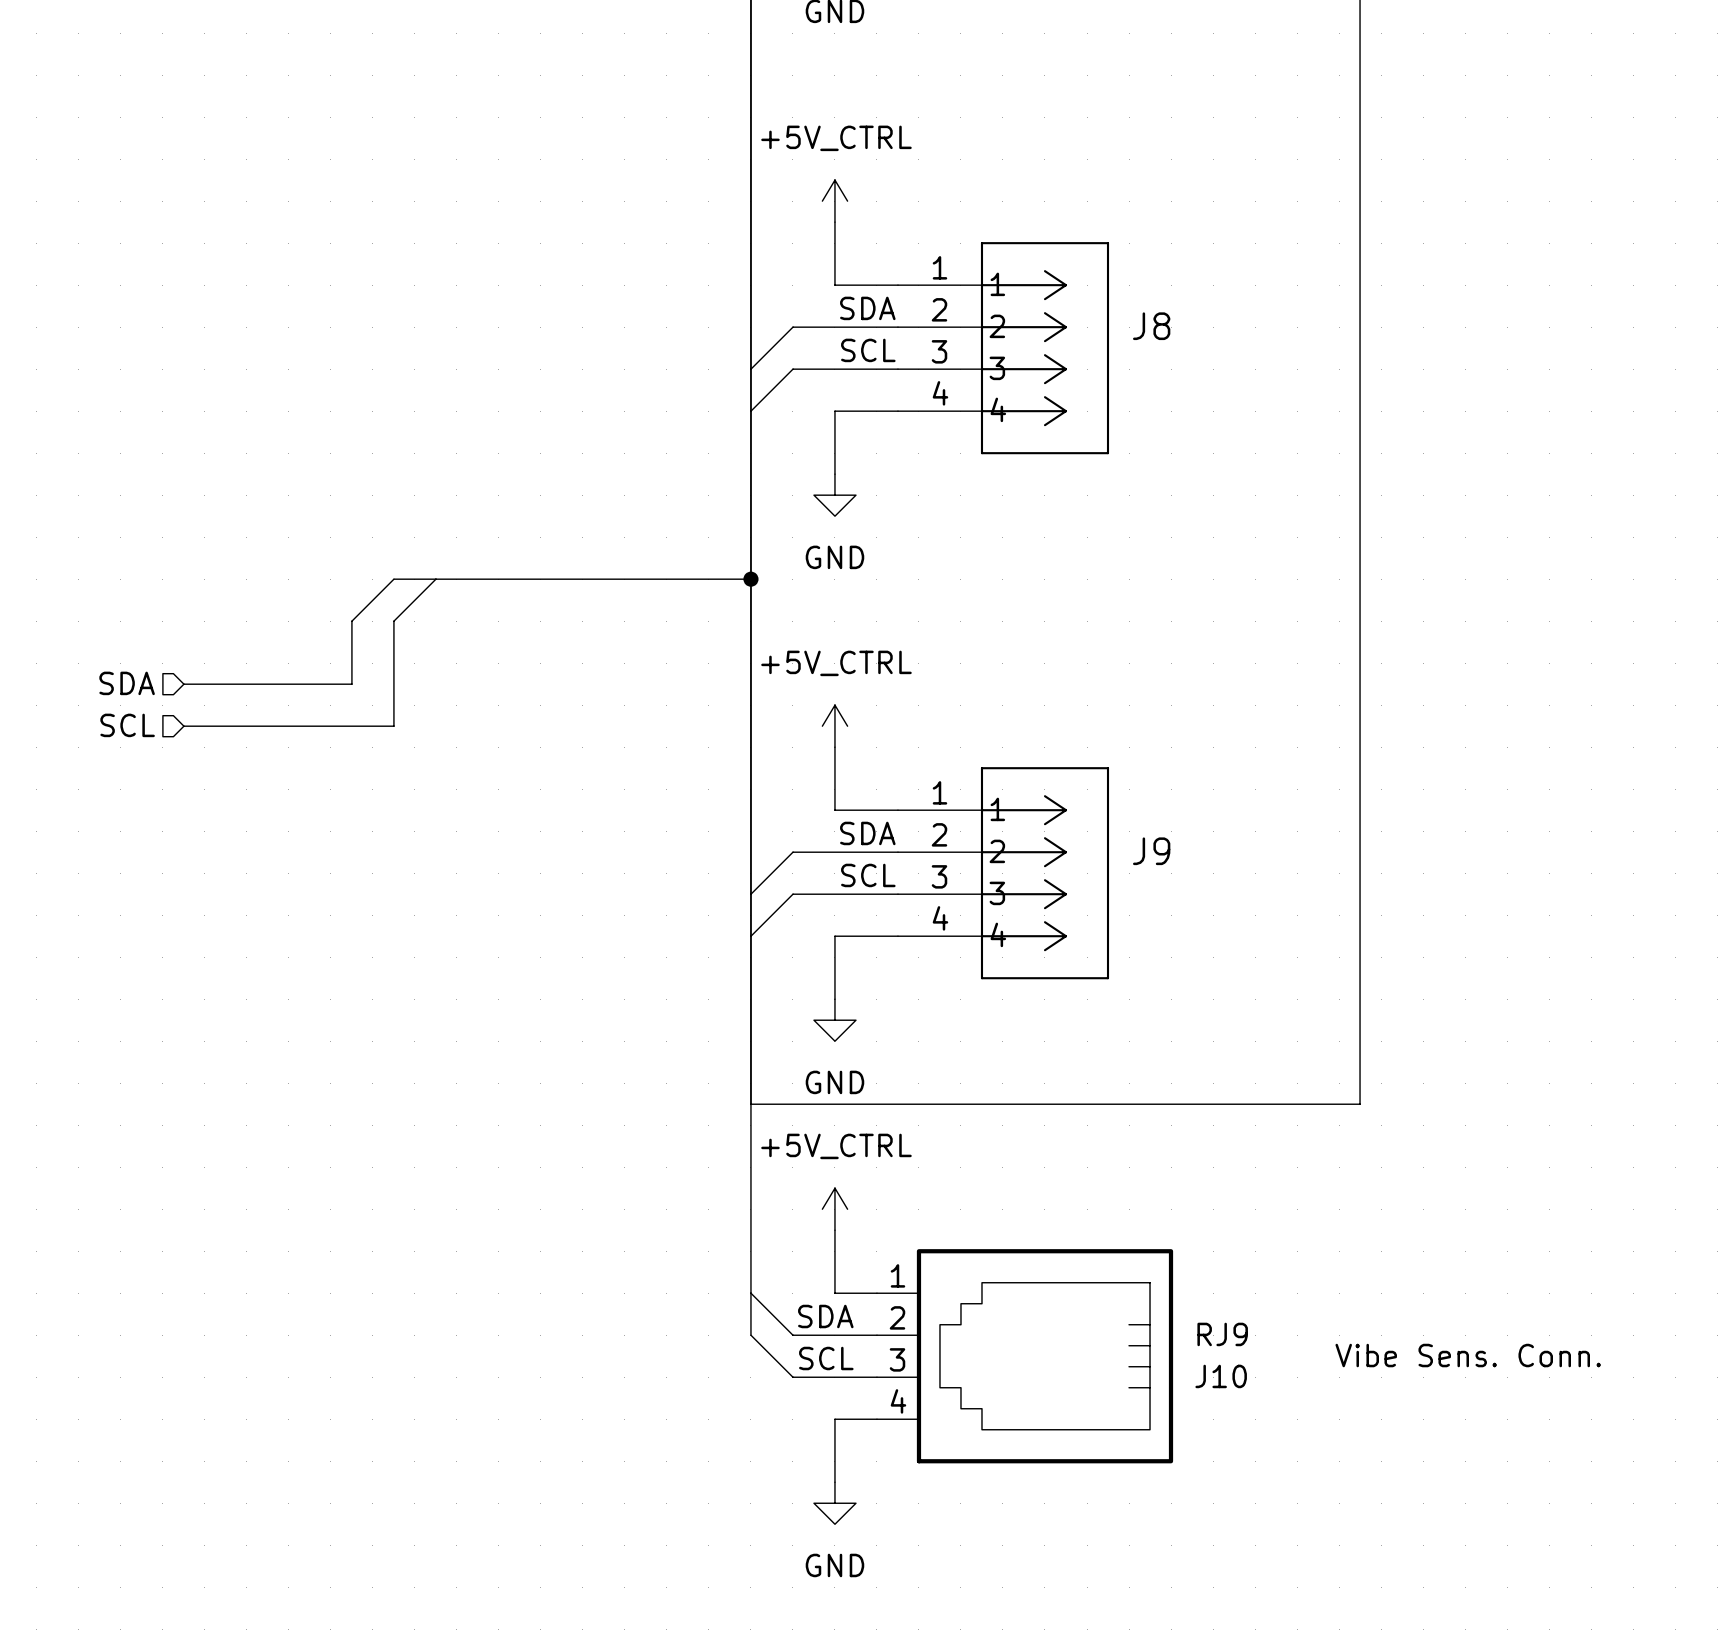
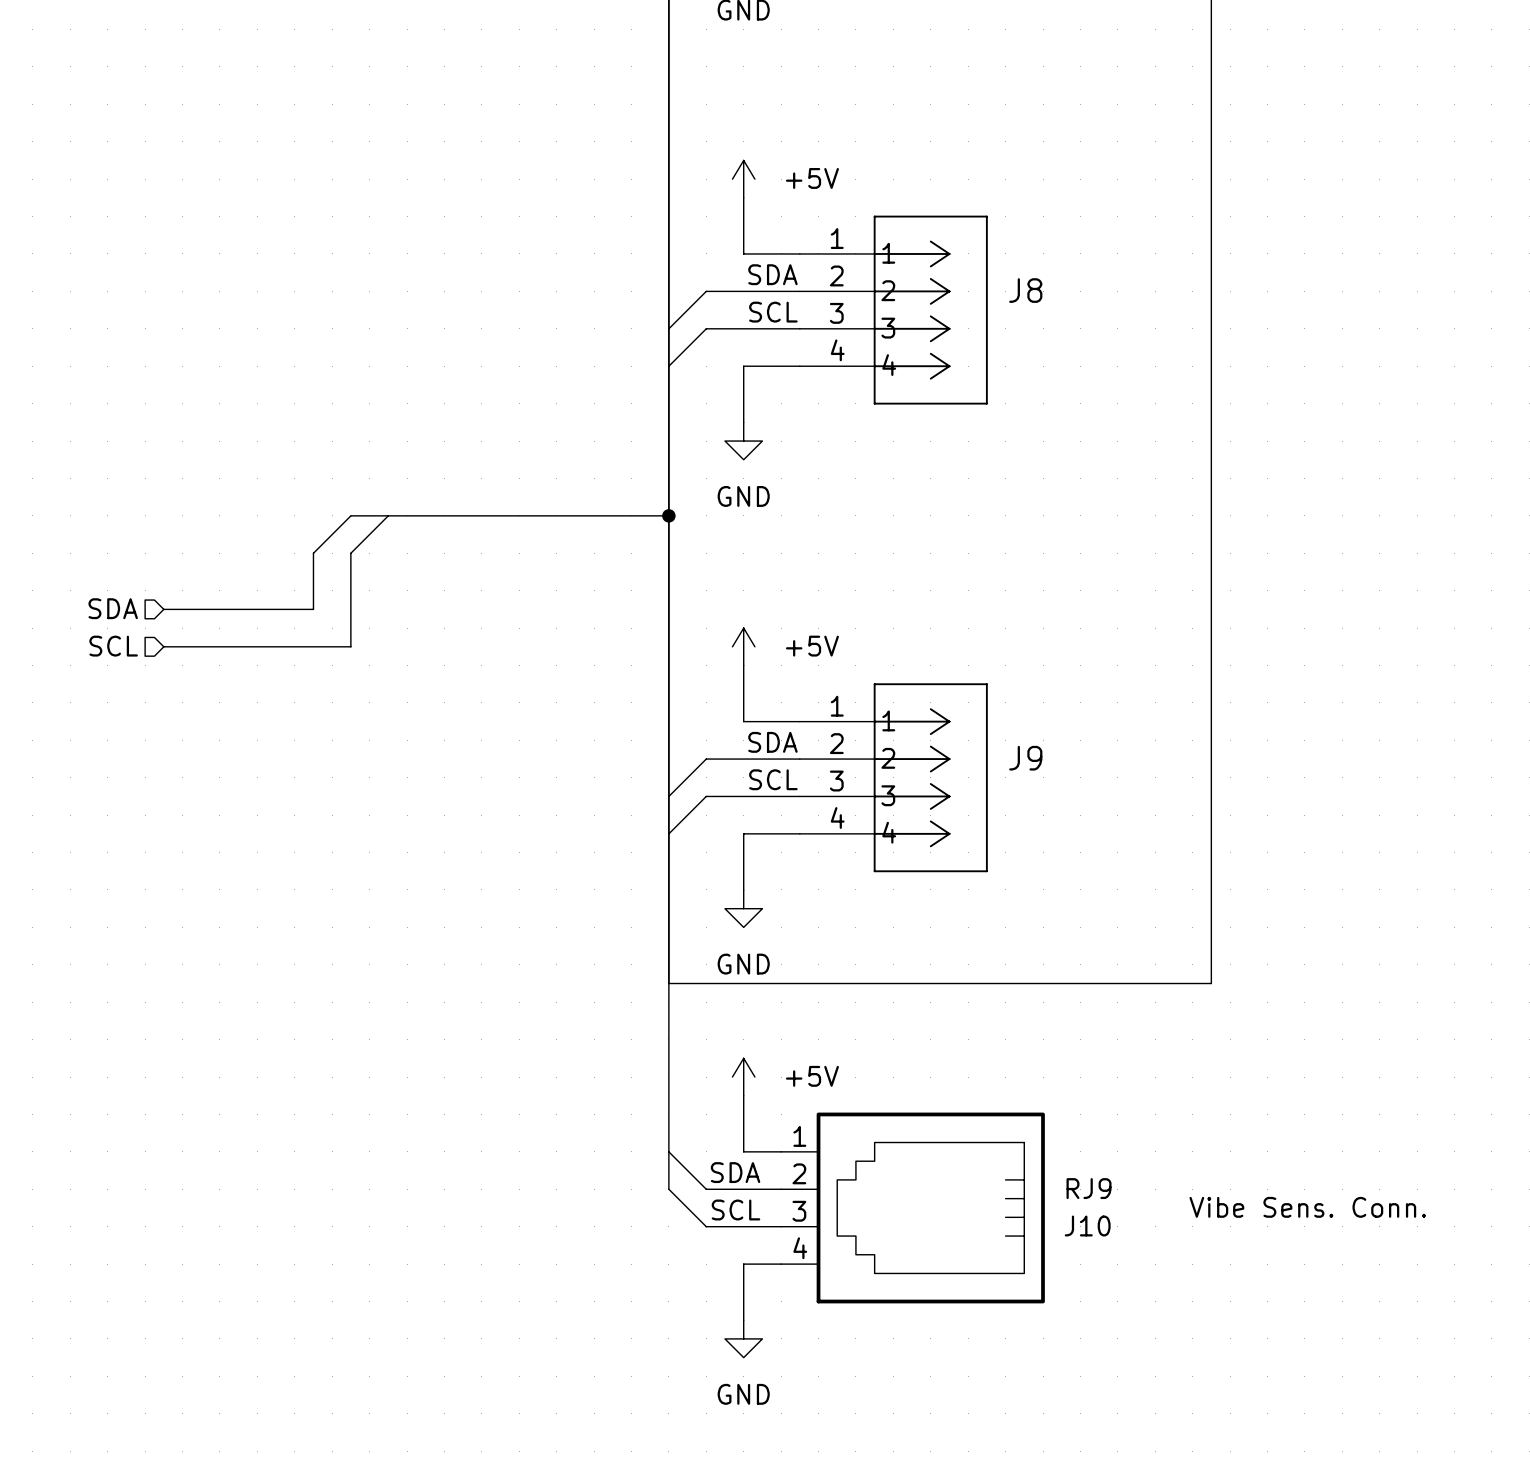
power symbol: +5V_CTRL (834, 201) -> +5V (743, 179)
power symbol: +5V_CTRL (834, 726) -> +5V (743, 646)
power symbol: +5V_CTRL (834, 1209) -> +5V (743, 1077)

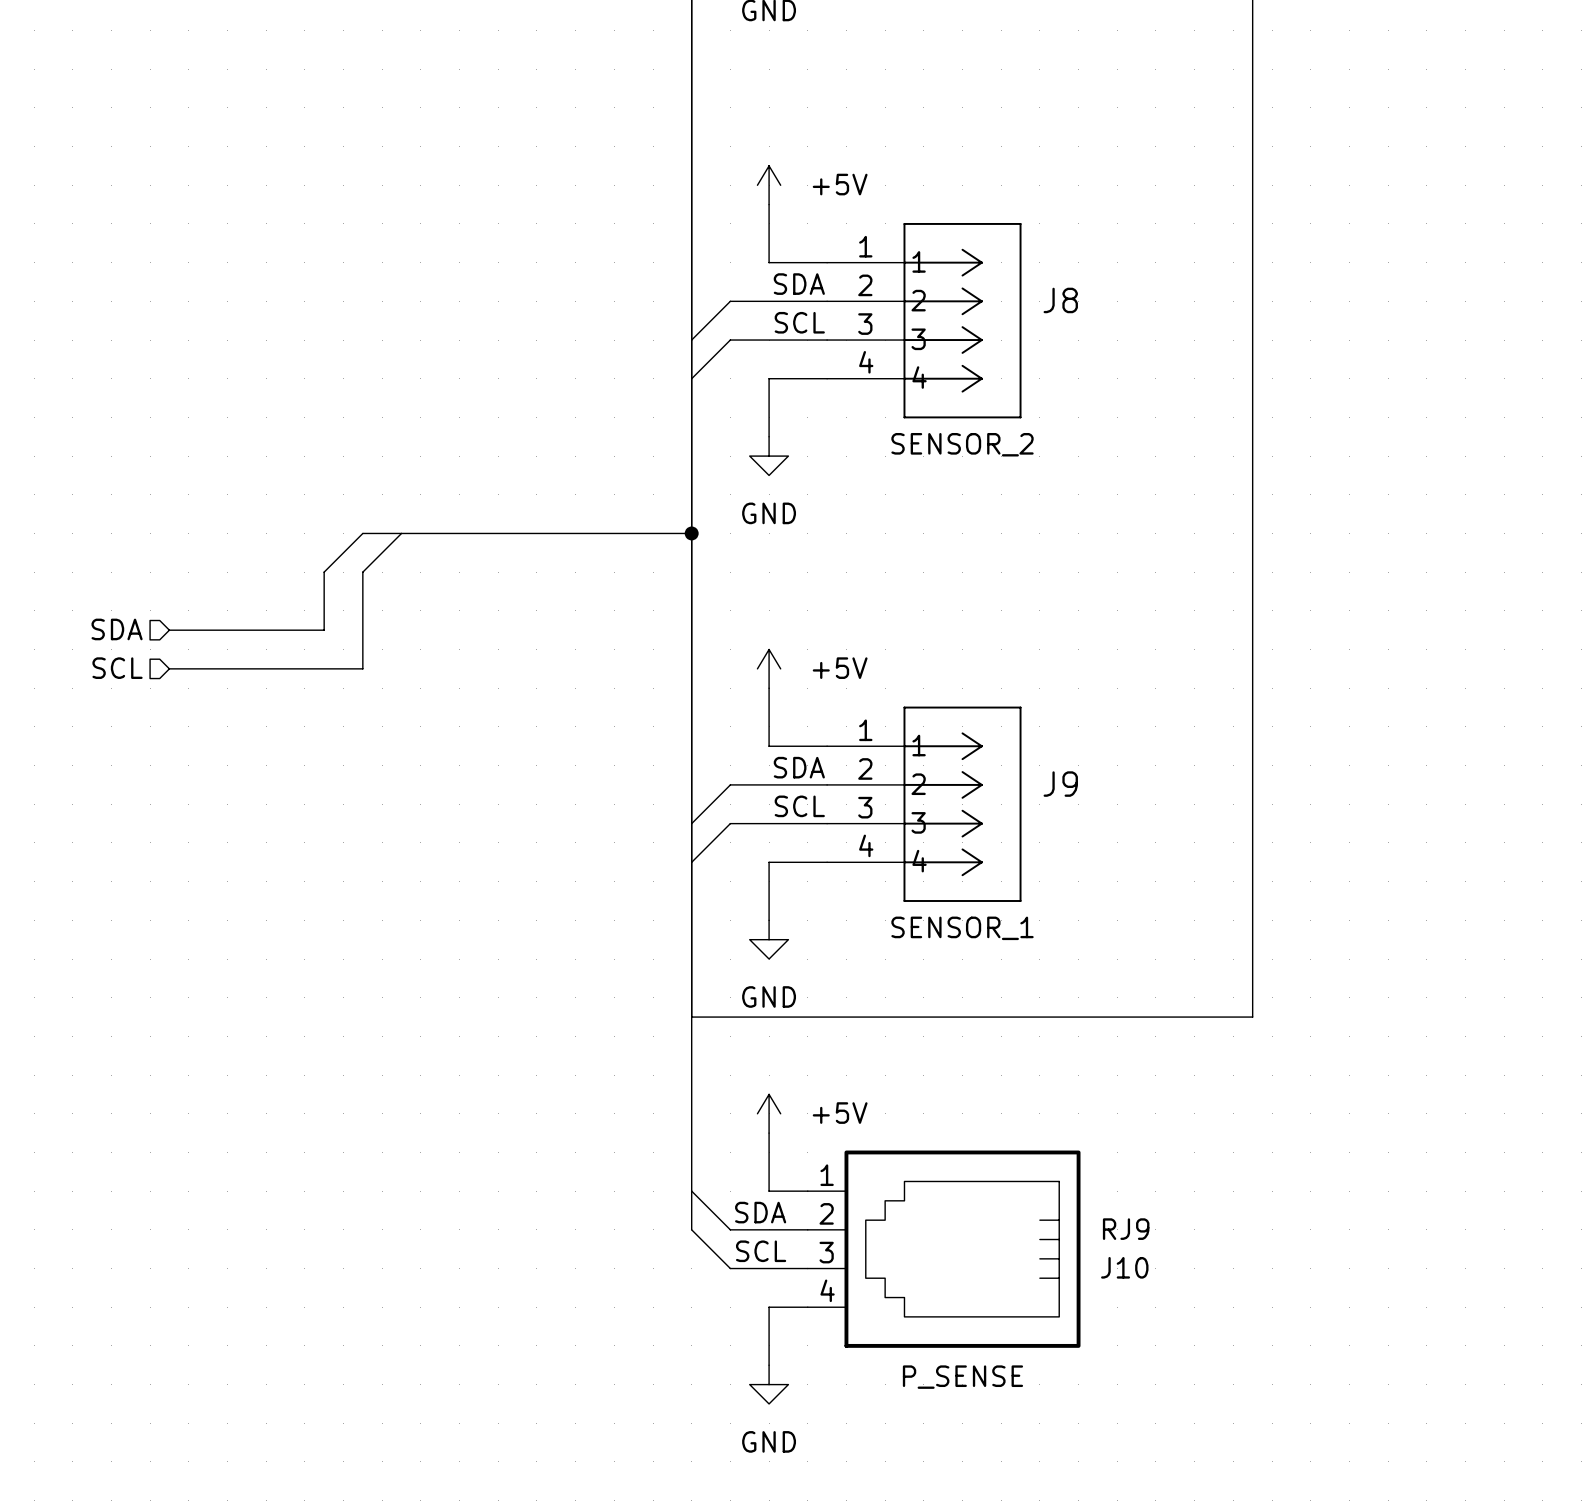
text: none -> SENSOR_2 (962, 444)
text: none -> SENSOR_1 (962, 928)
text: Vibe Sens. Conn. (1307, 1207) -> none
text: none -> P_SENSE (962, 1377)

